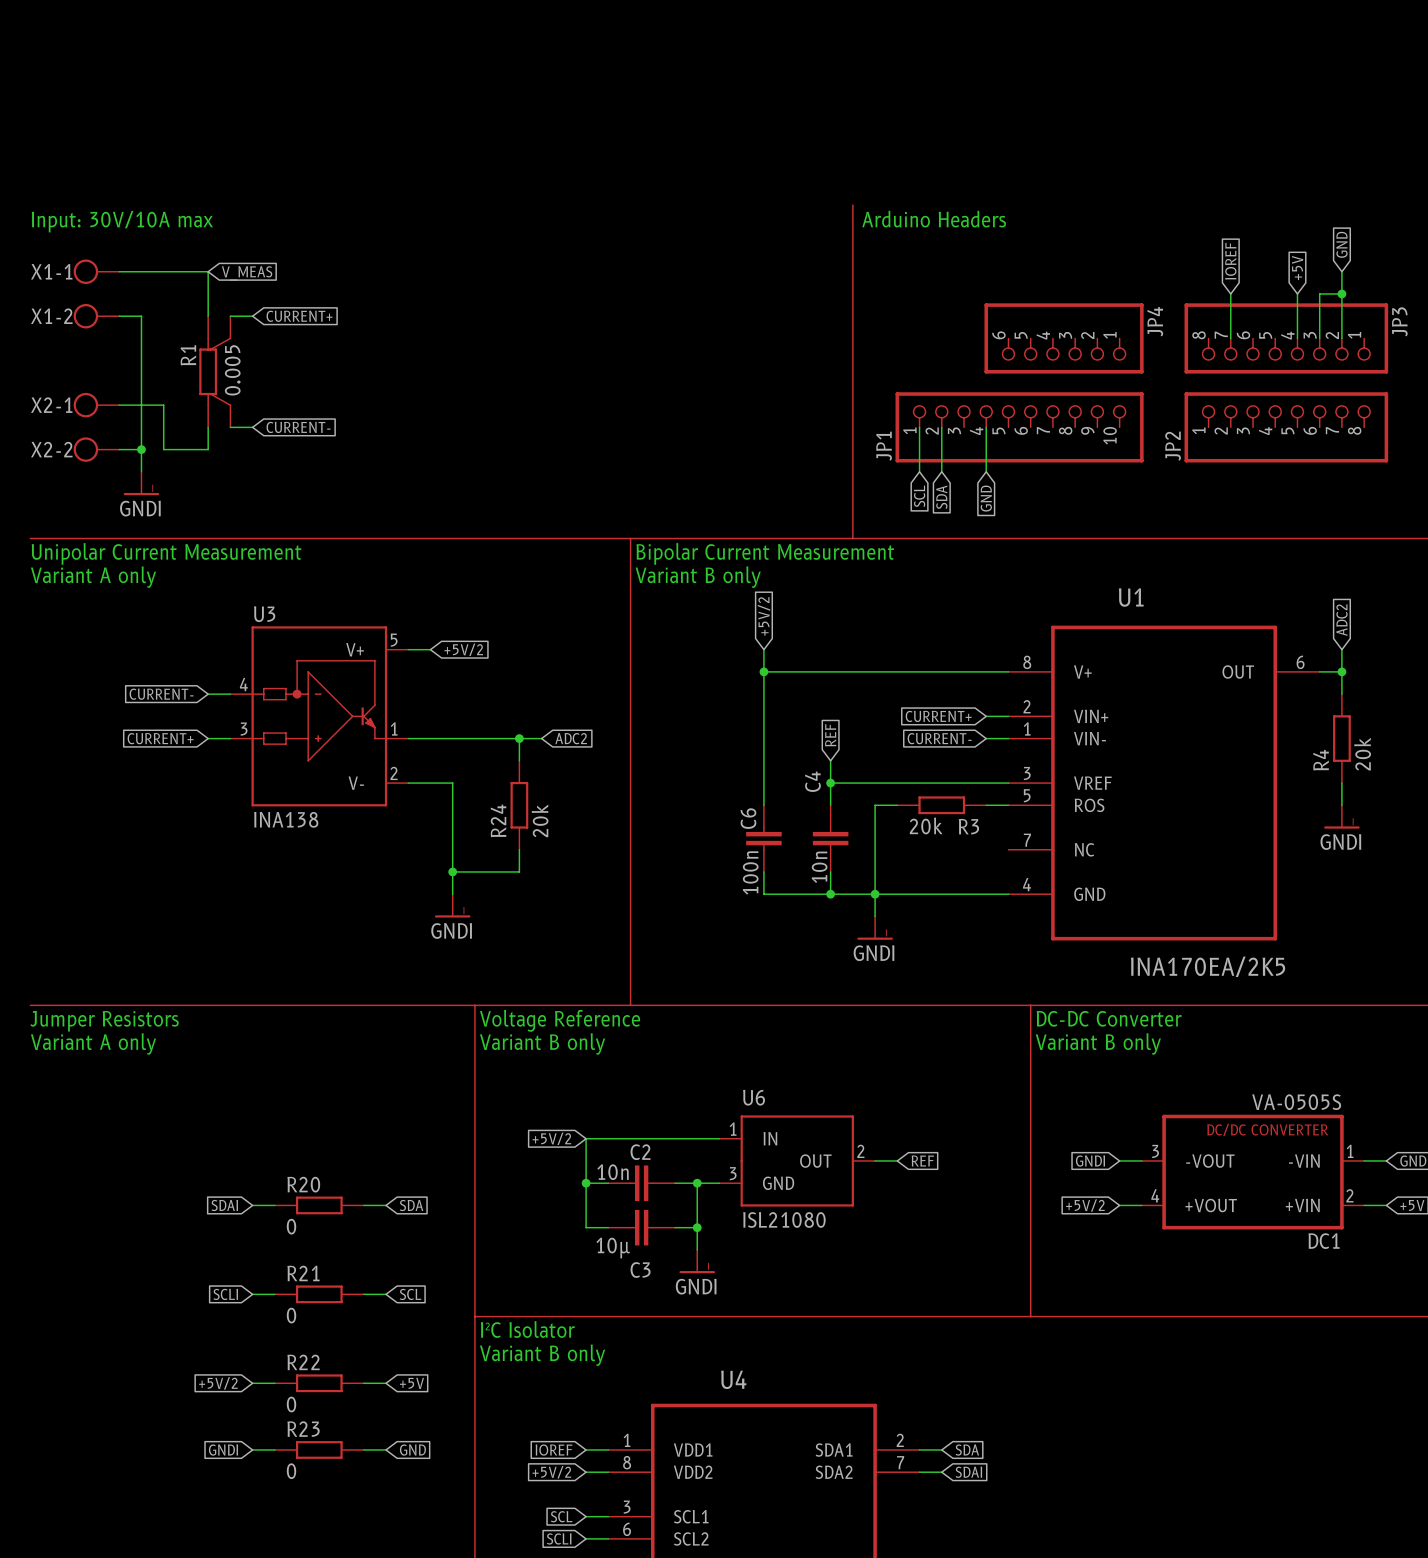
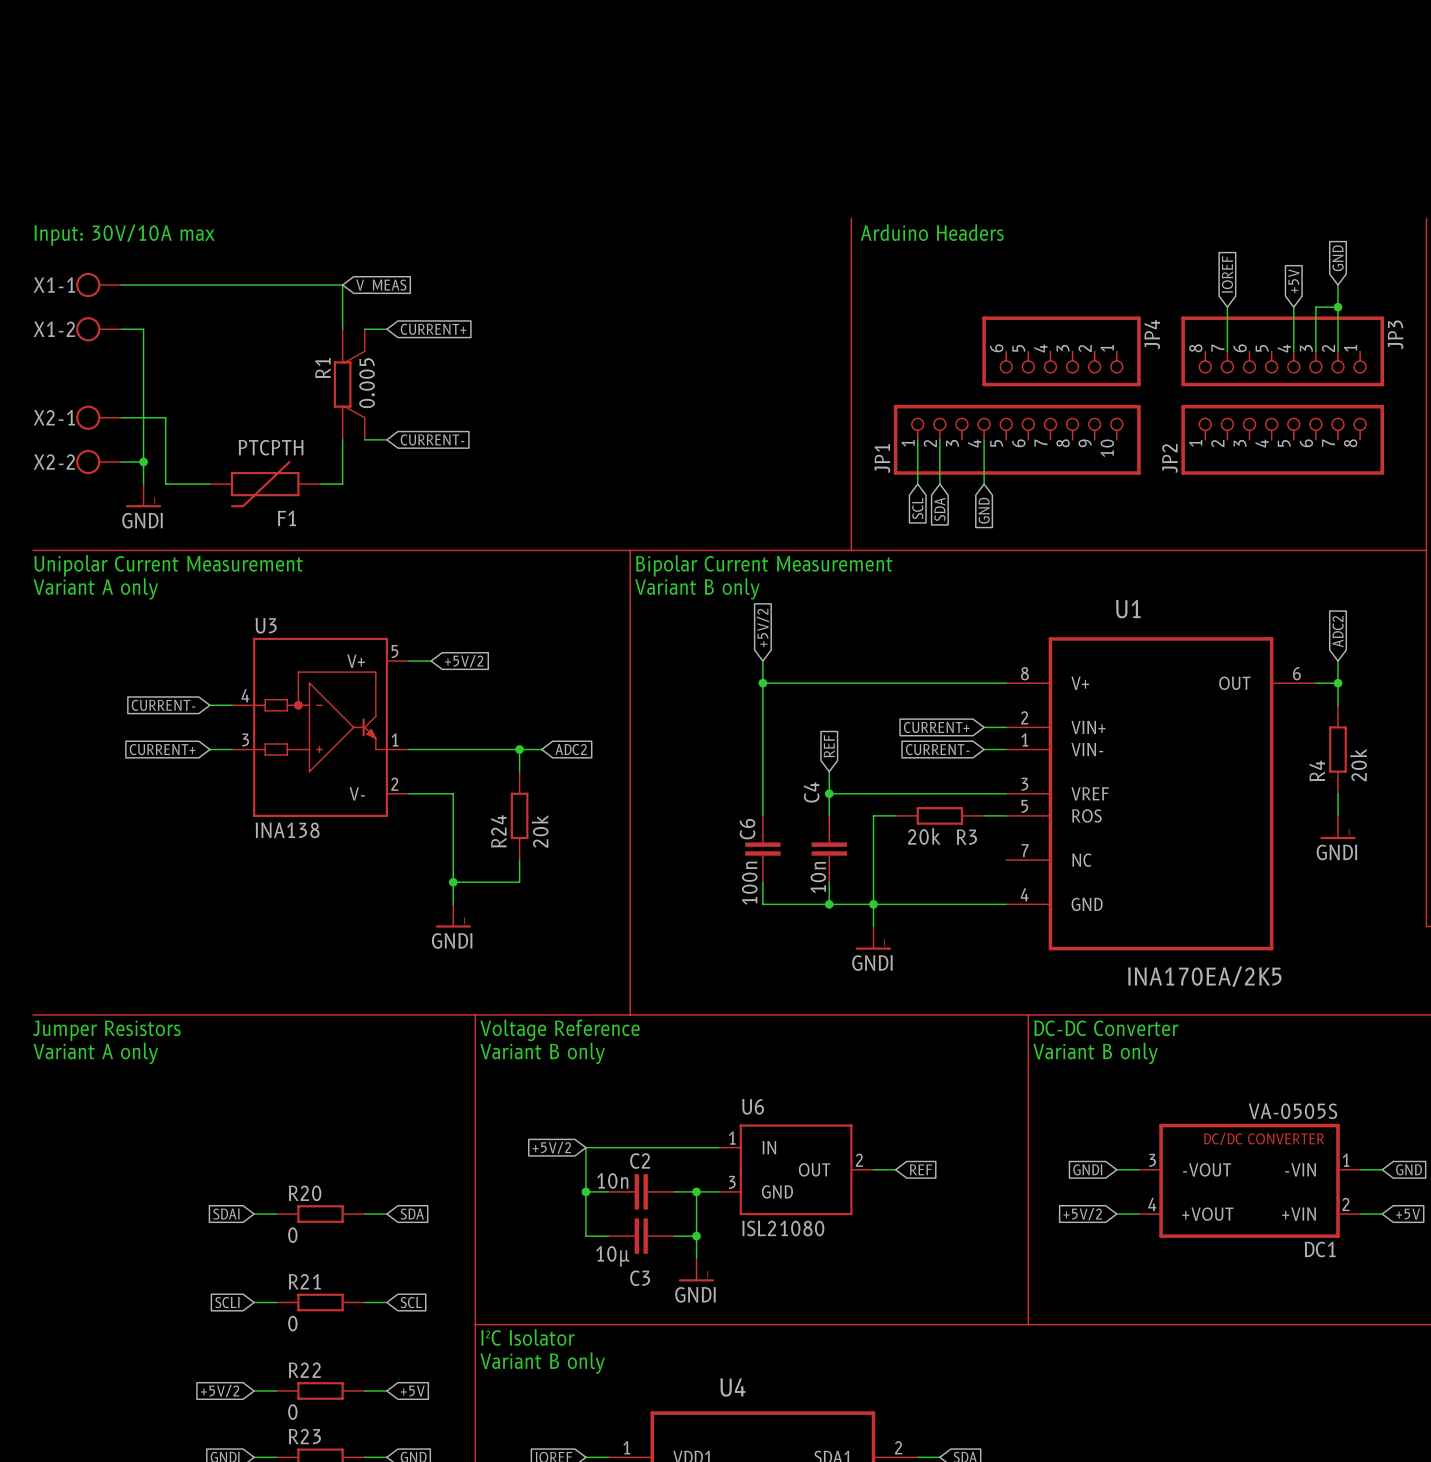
wire: (208, 271) (208, 316) -> (209, 285) (342, 285) (342, 329)
global label position: V_MEAS (247, 273) -> V_MEAS (381, 286)
wire: (230, 316) (252, 316) -> (364, 329) (386, 329)
global label position: CURRENT+ (299, 316) -> CURRENT+ (433, 329)
R1 position: (215, 371) -> (349, 384)
wire: (208, 427) (208, 449) (163, 449) -> (209, 484) (165, 484) (165, 461)
wire: (230, 427) (252, 427) -> (364, 439) (386, 439)
global label position: CURRENT- (298, 427) -> CURRENT- (432, 439)
wire: none -> (342, 439) (342, 484) (320, 484)
F1: none -> PTCPTH (265, 484)

